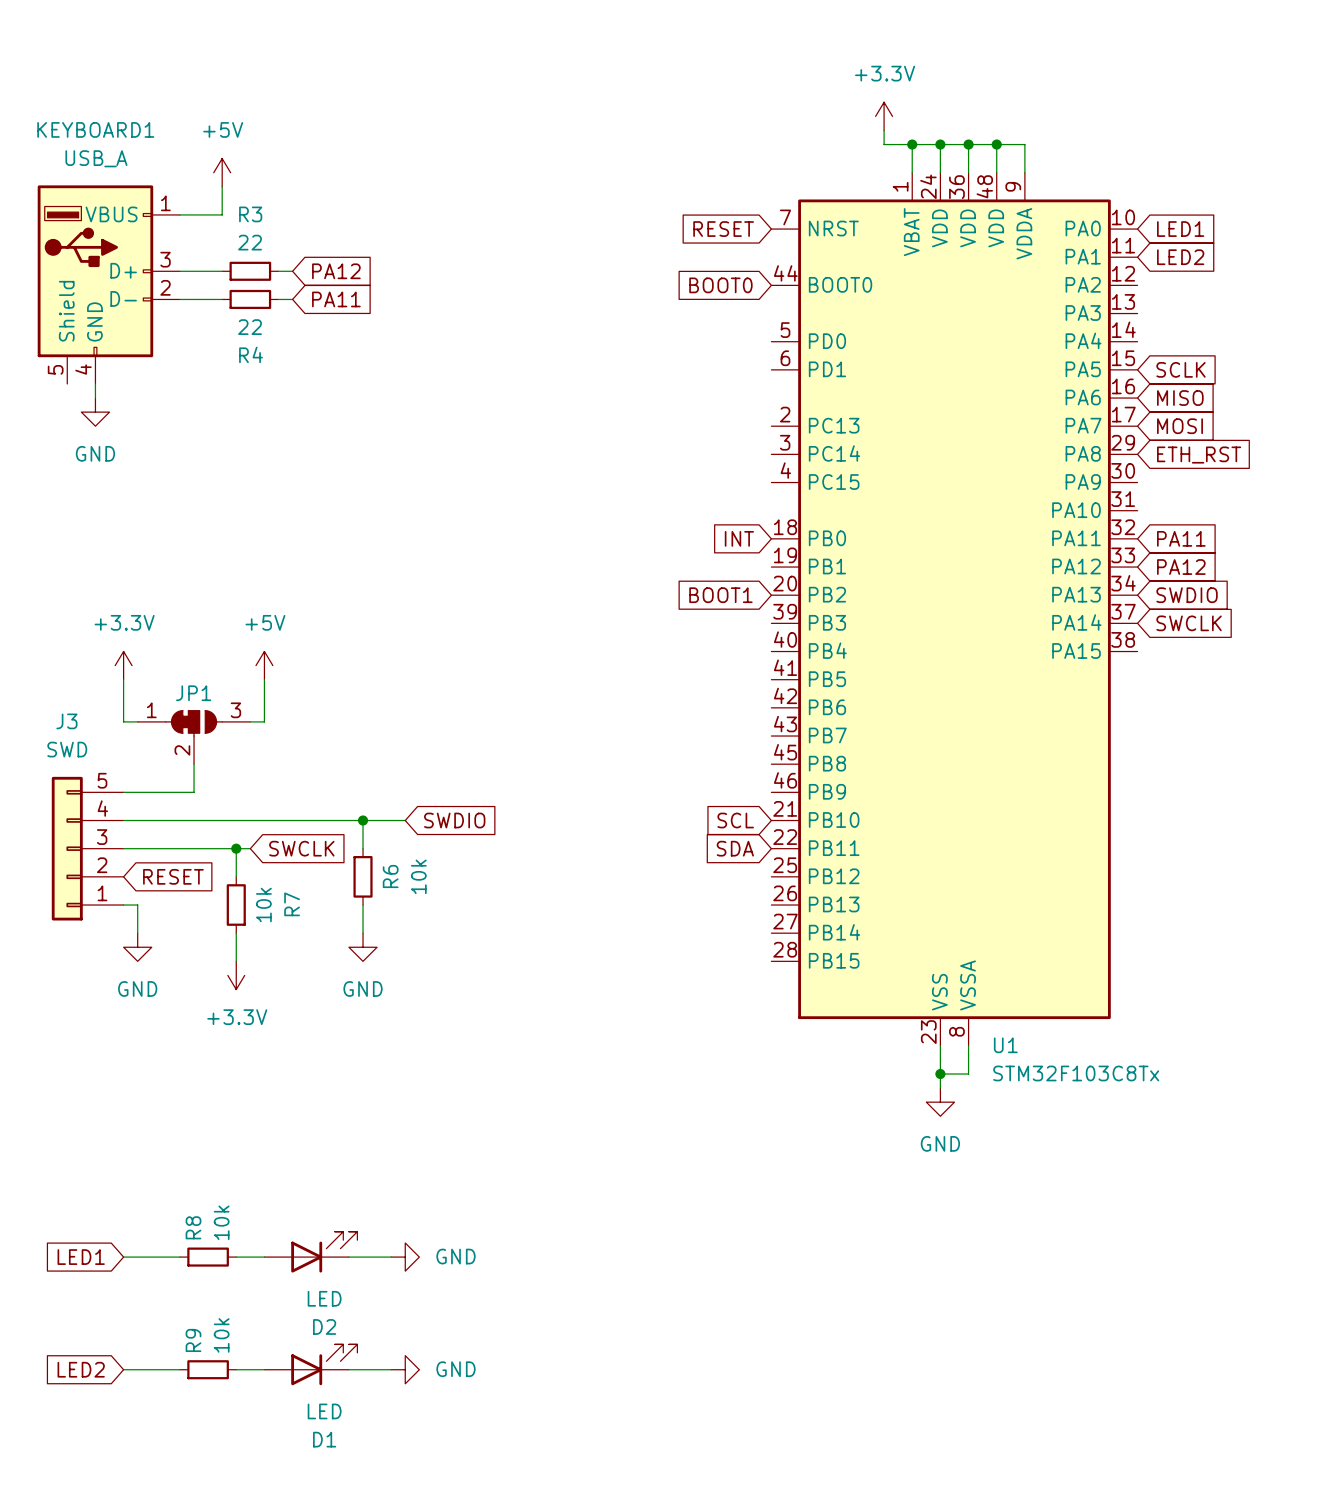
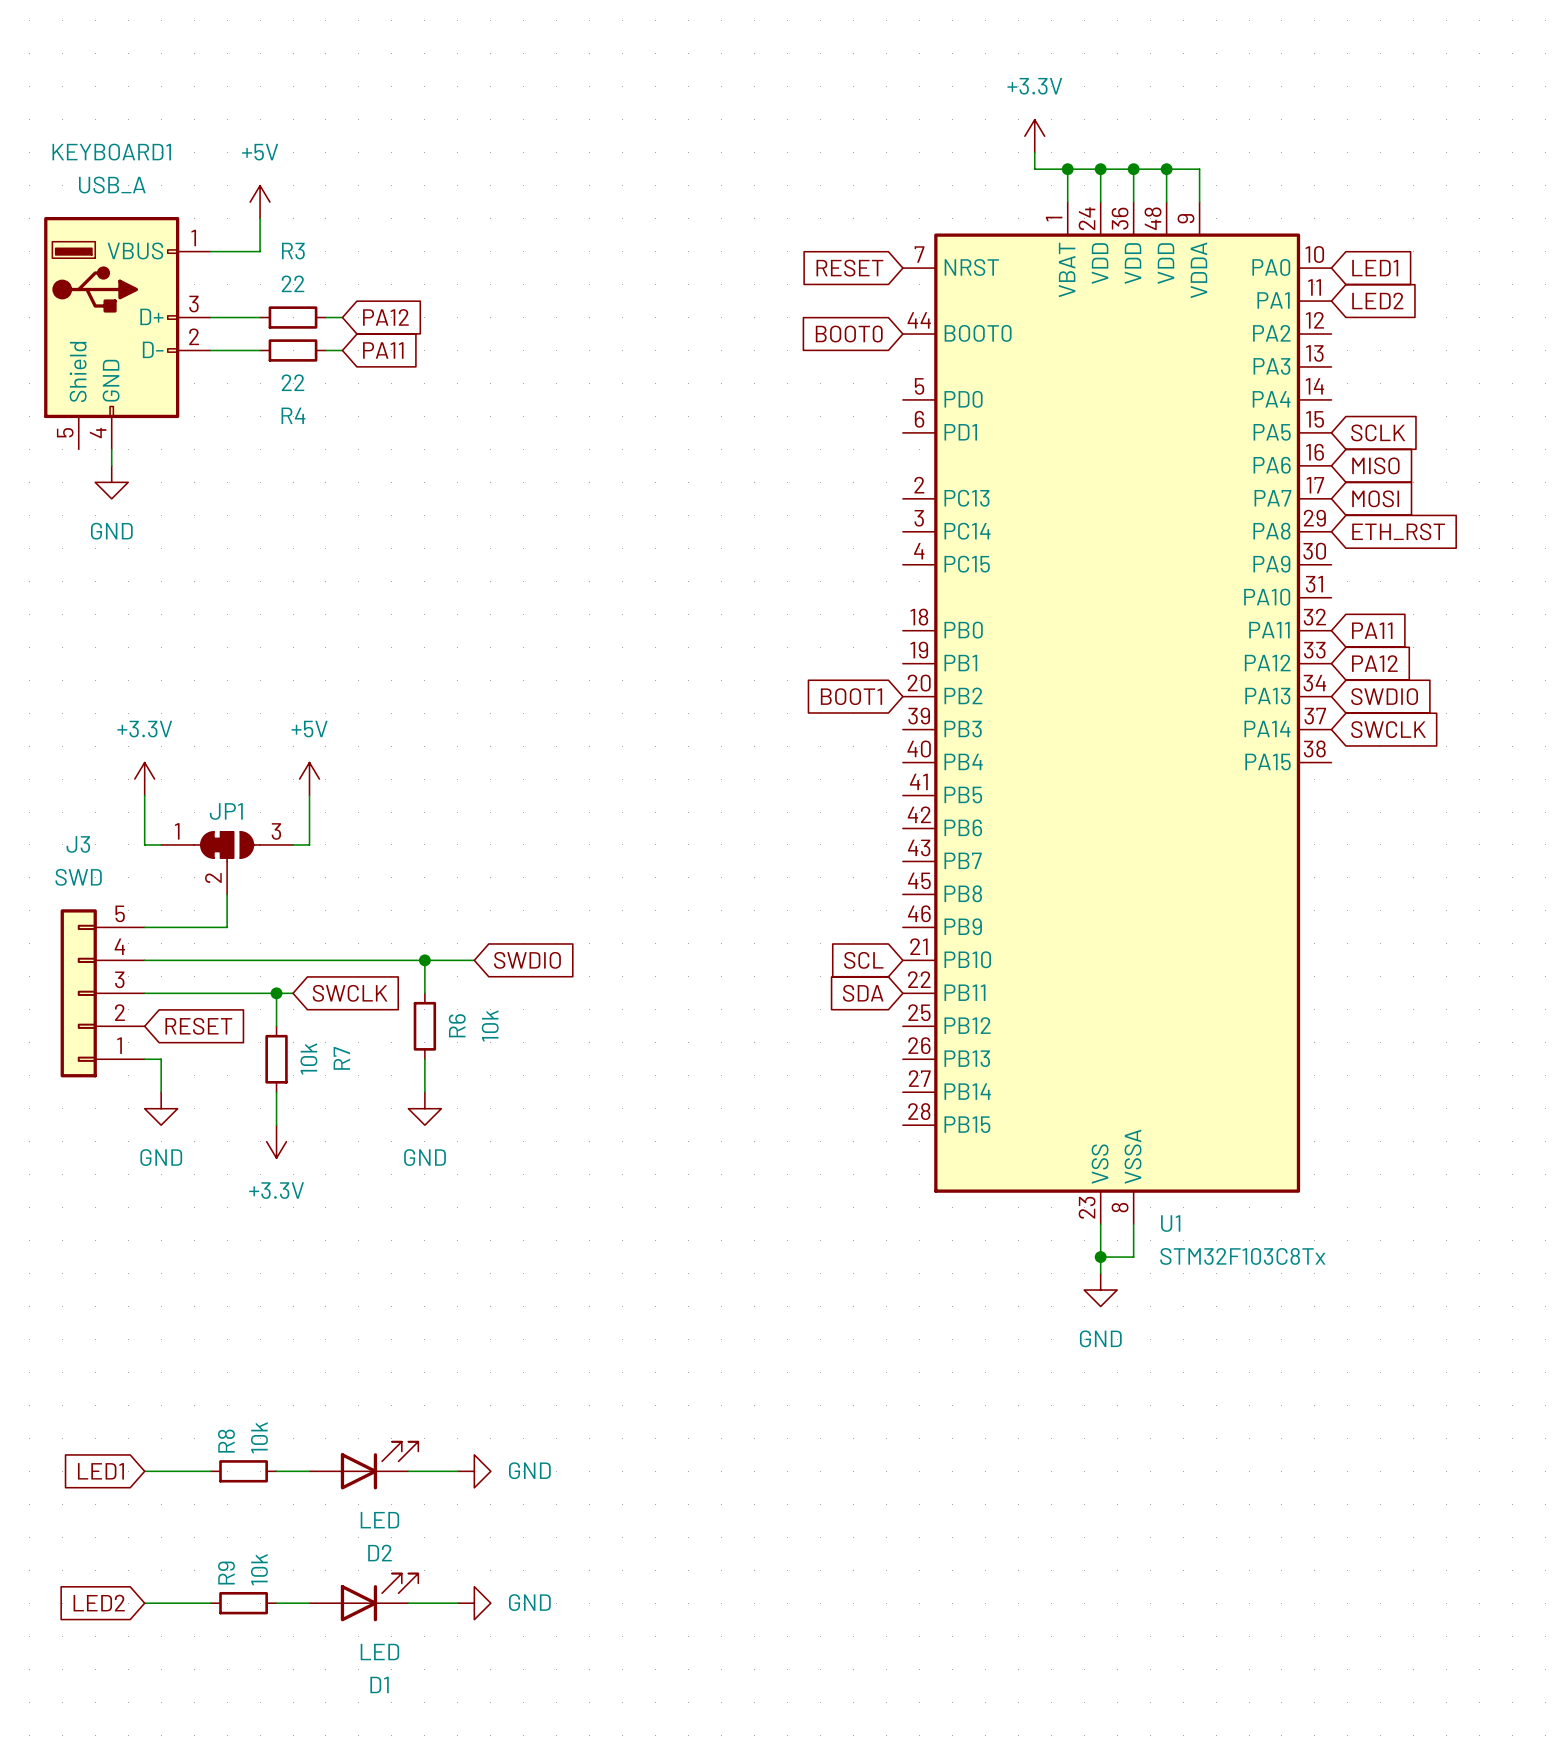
global label: INT (739, 538) -> none

